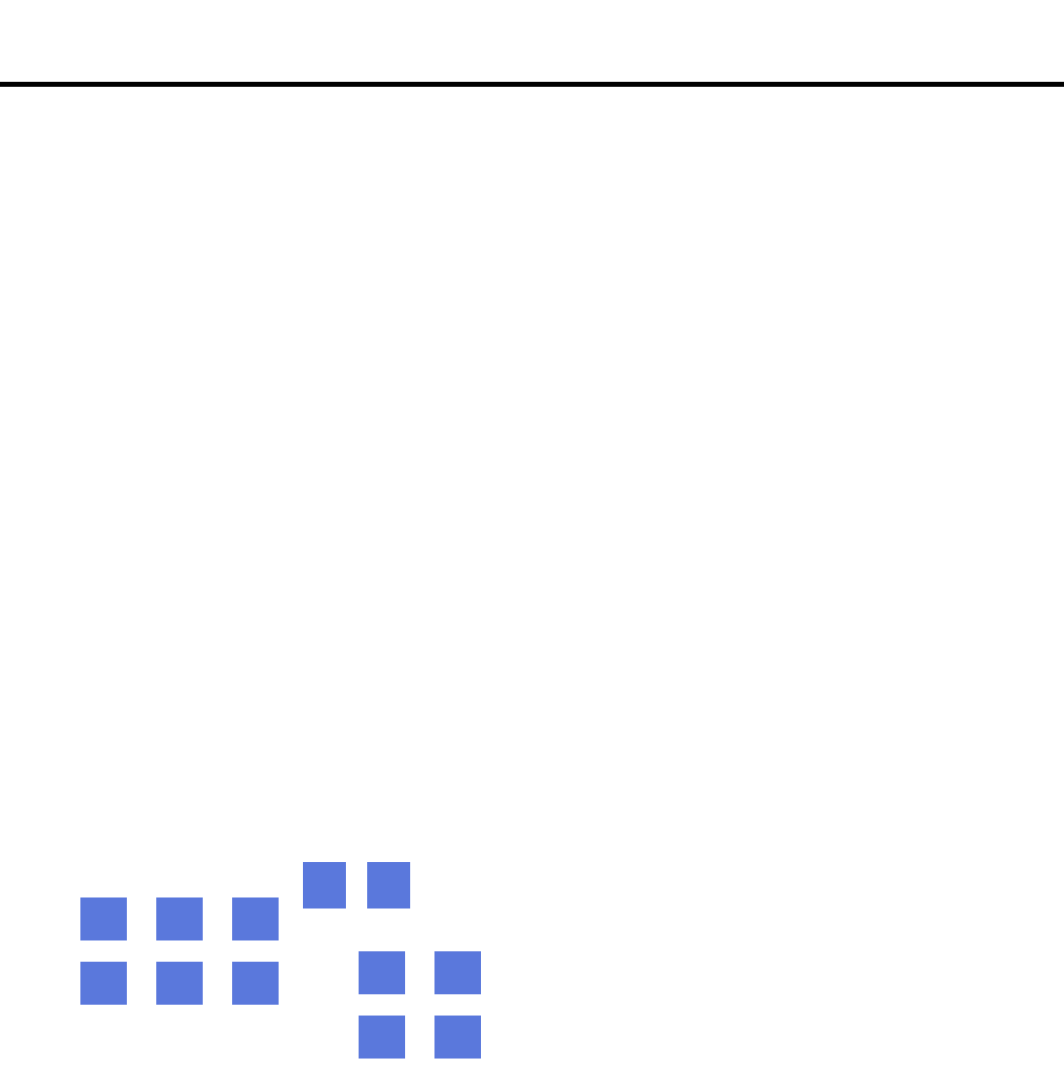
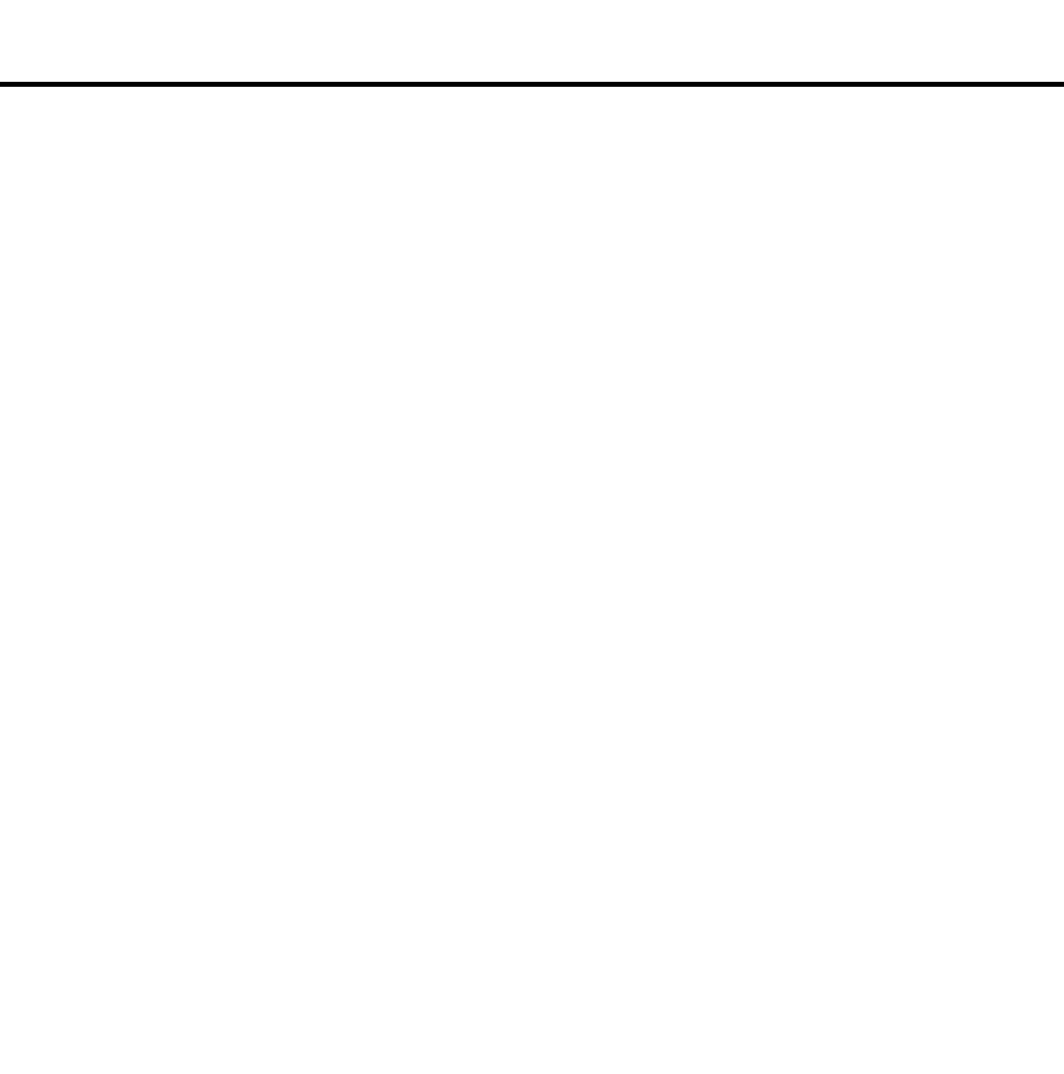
part: (356, 885) -> none
part: (103, 951) -> none
part: (179, 951) -> none
part: (255, 951) -> none
part: (381, 1004) -> none
part: (457, 1004) -> none

